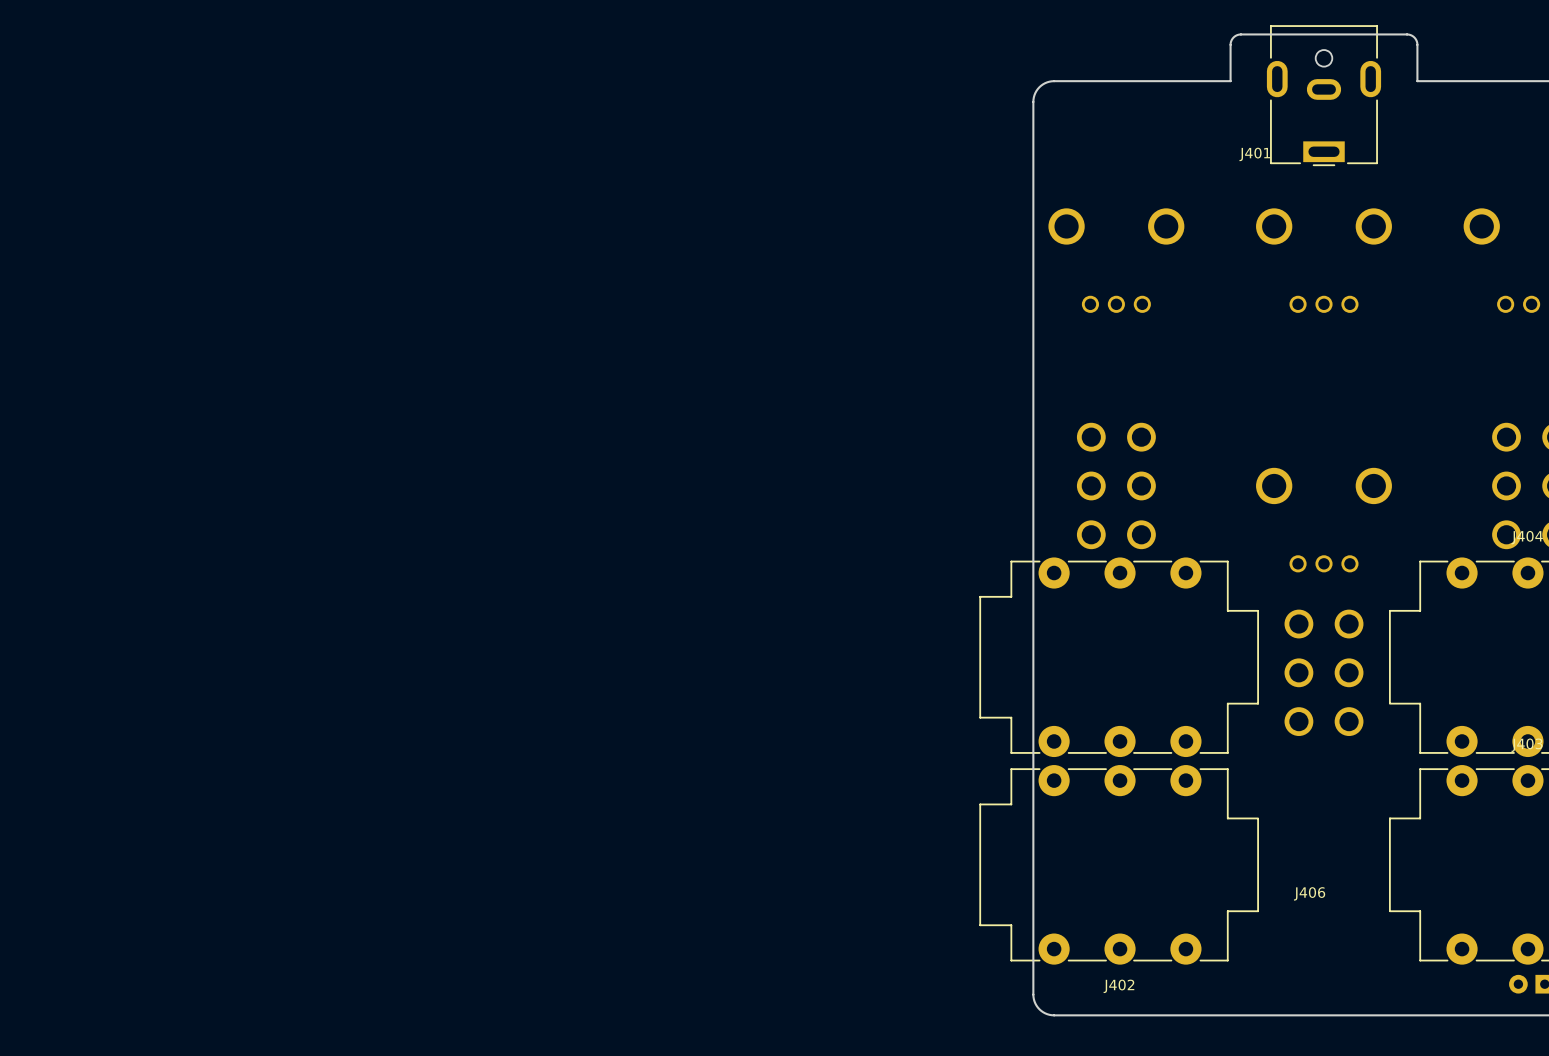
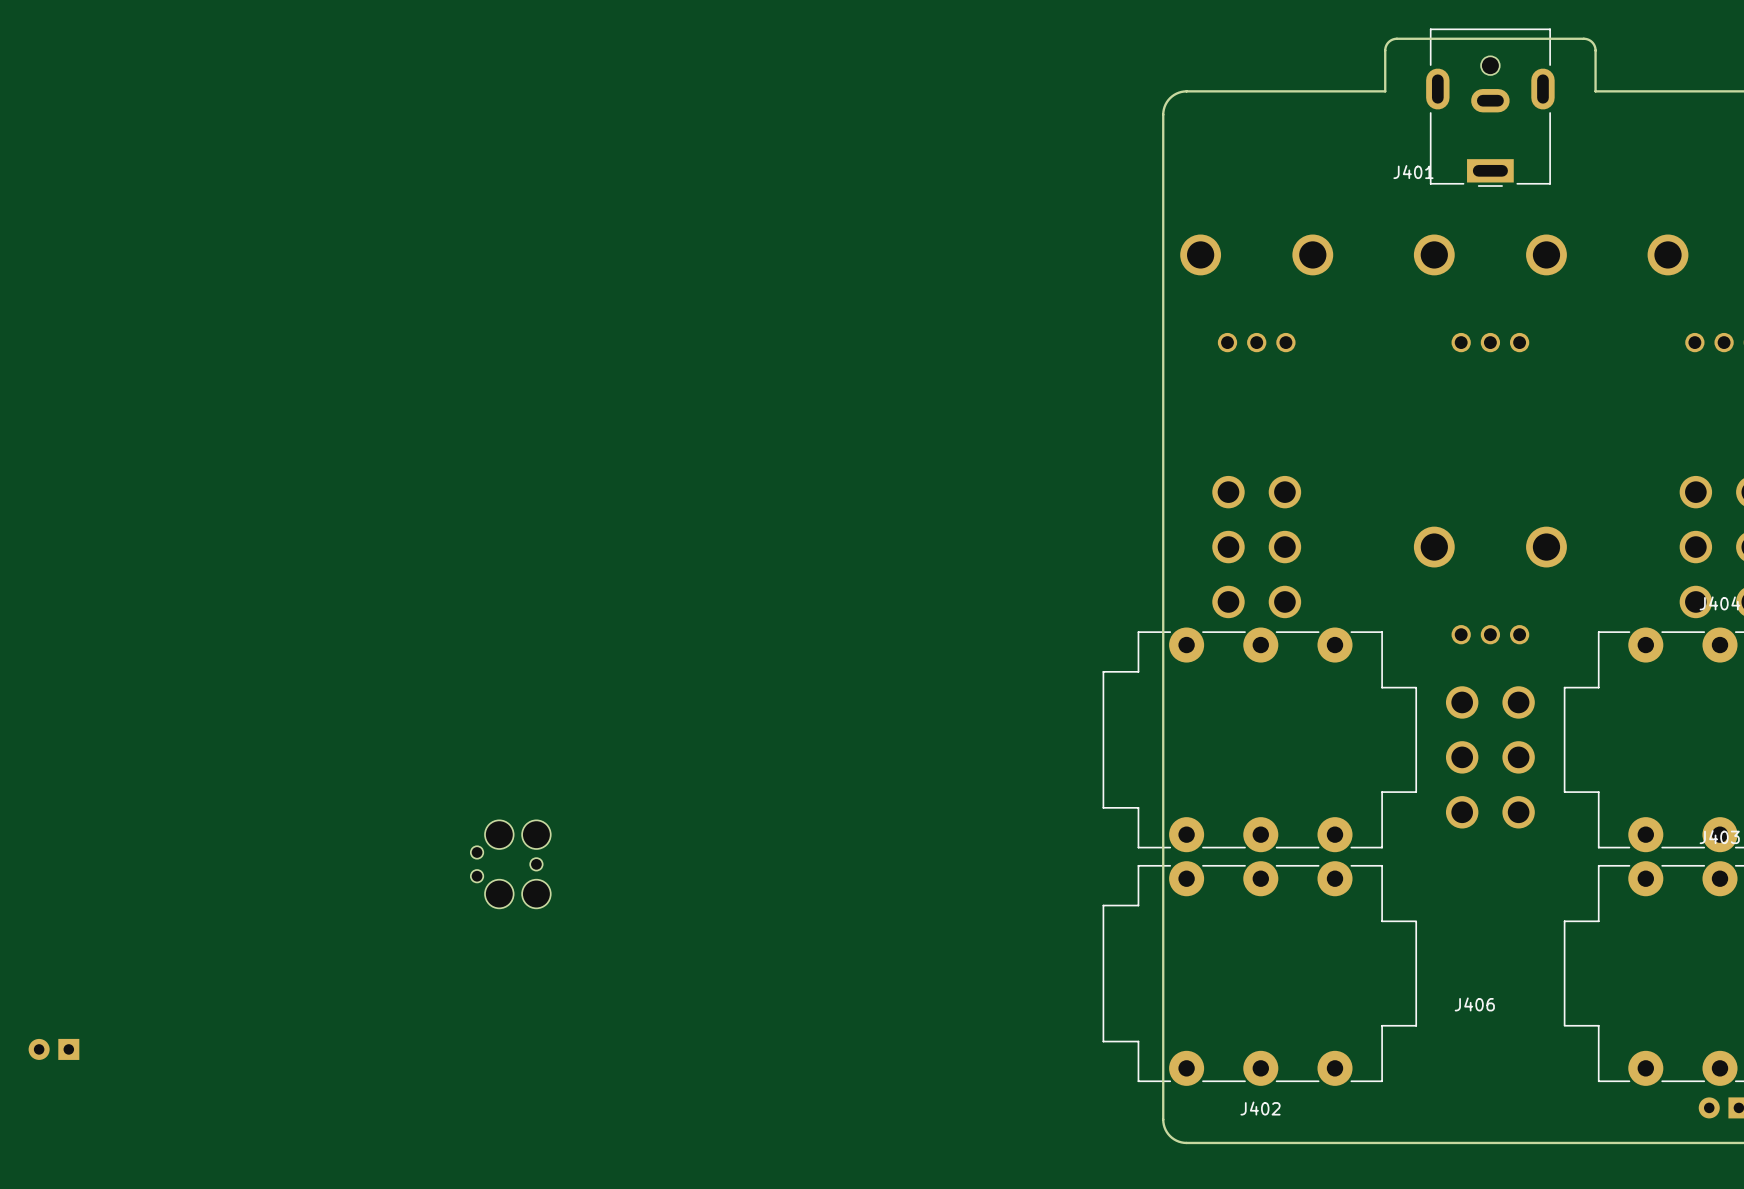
part: none -> (510, 864)
part: none -> (53, 1049)

